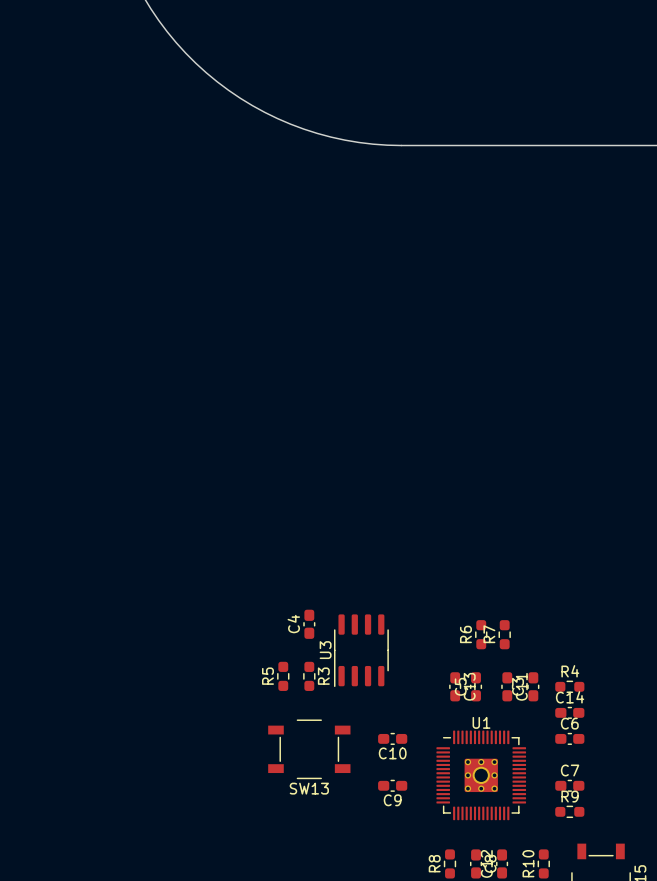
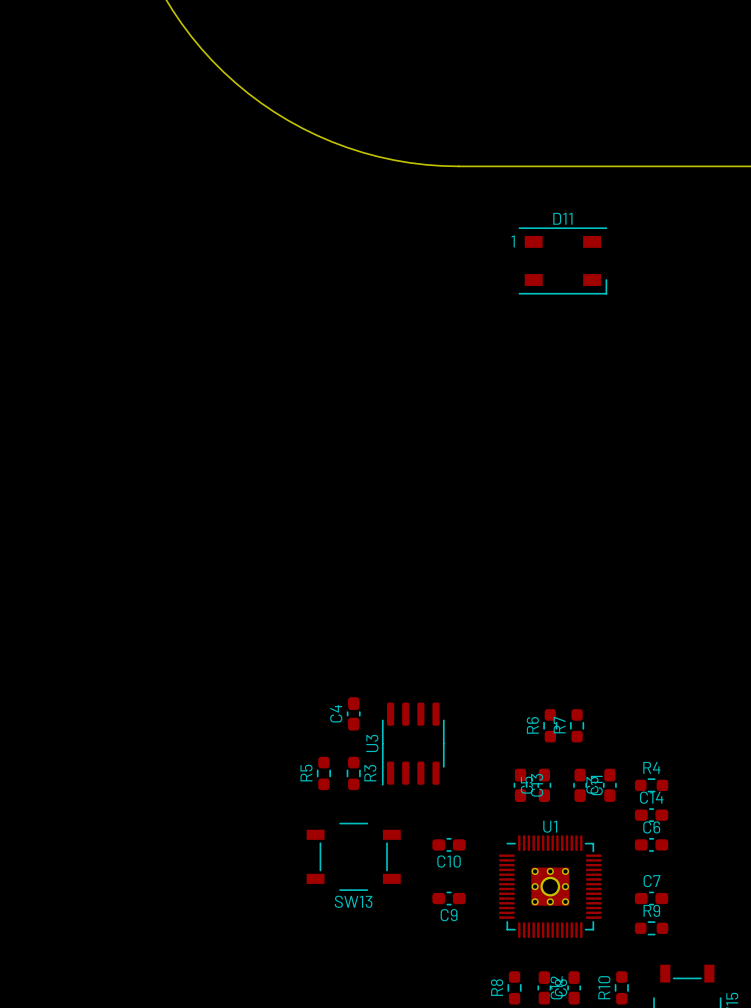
D11: none -> (562, 260)

